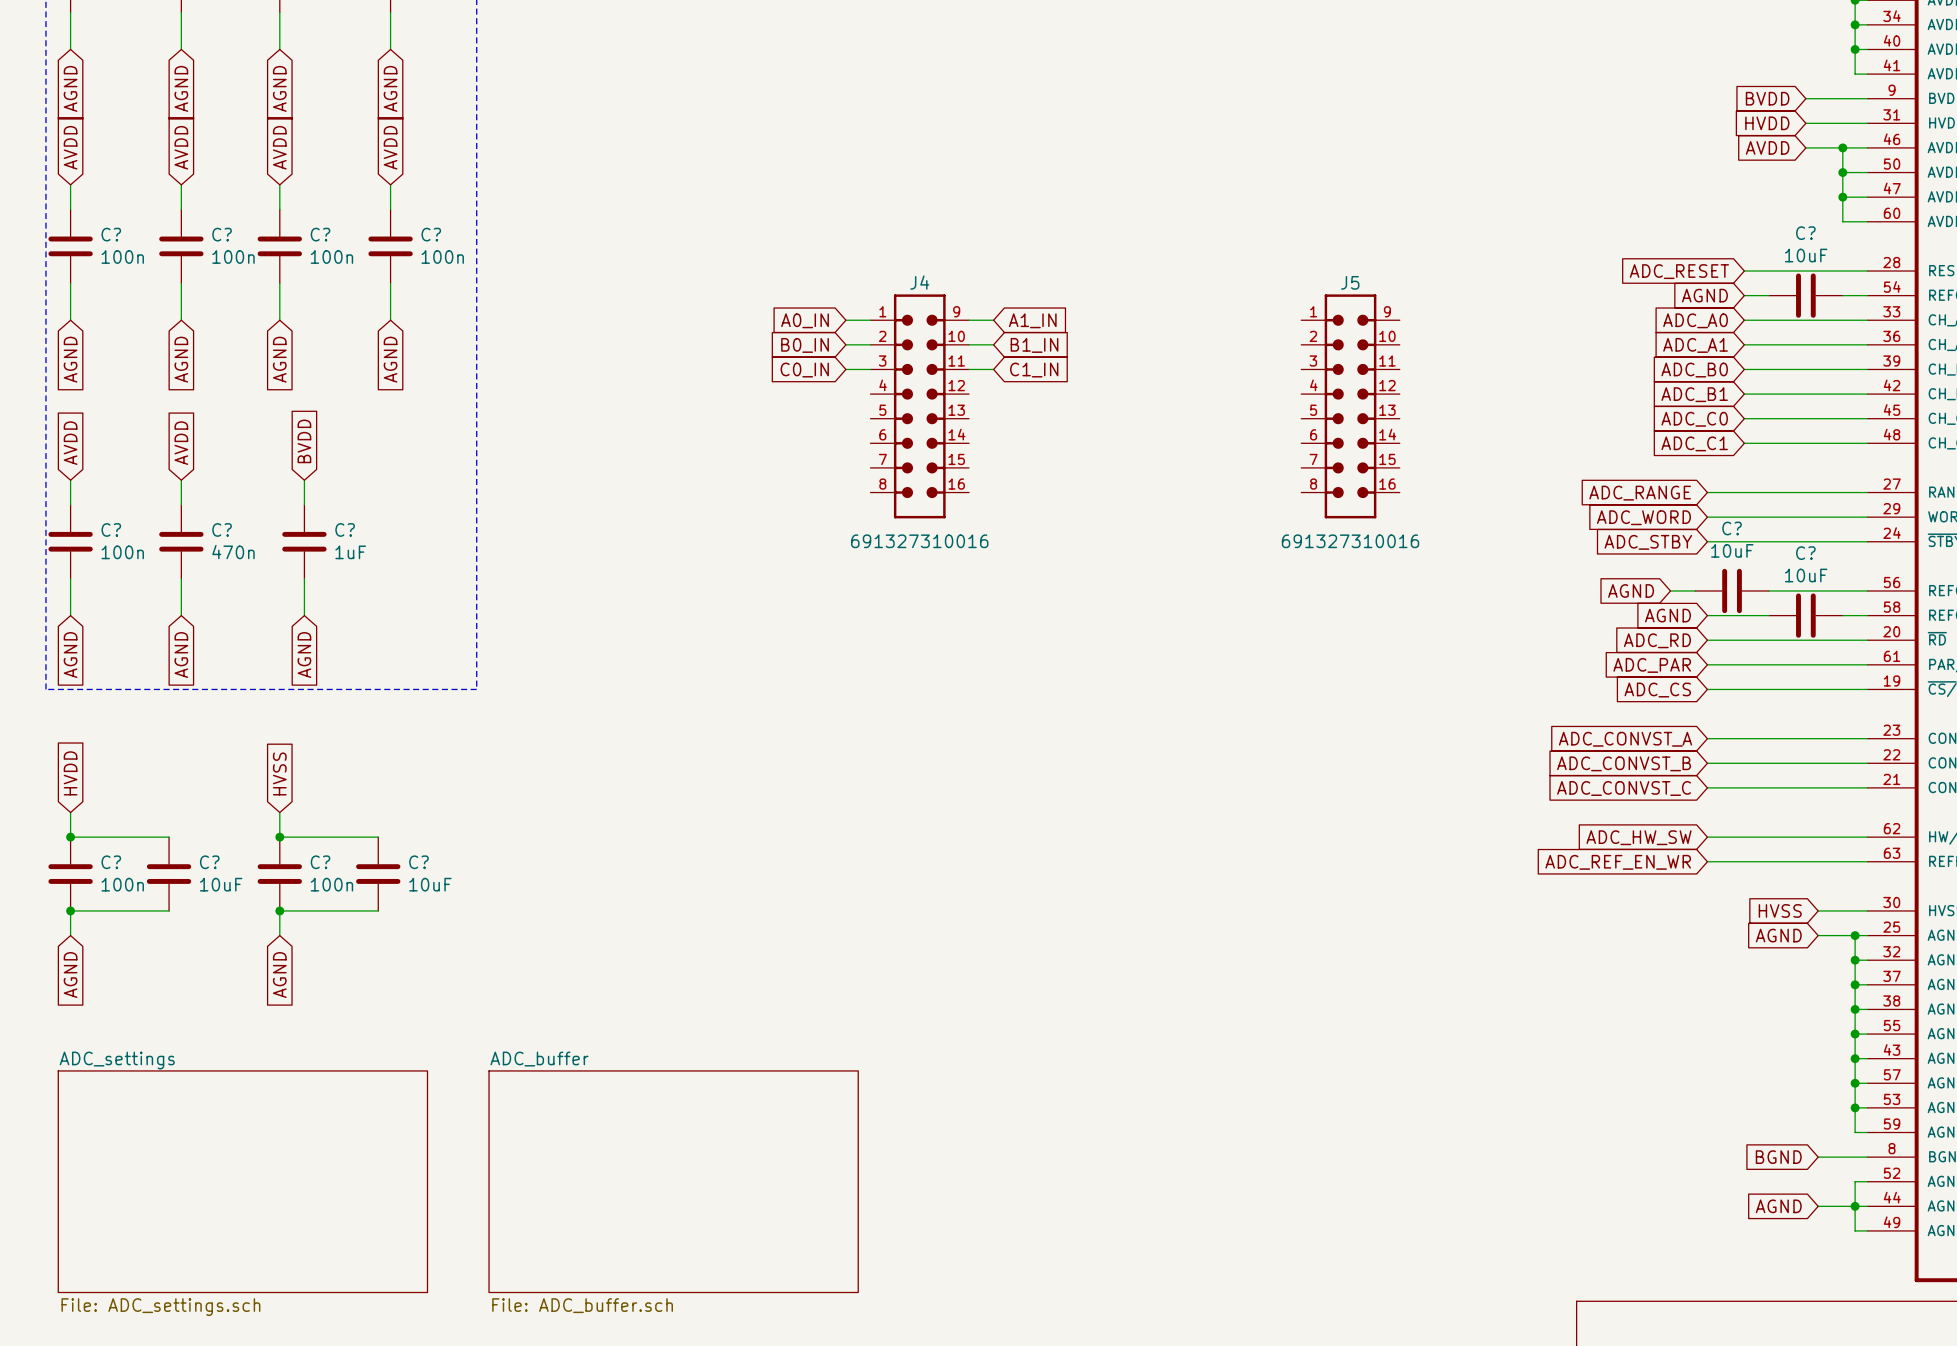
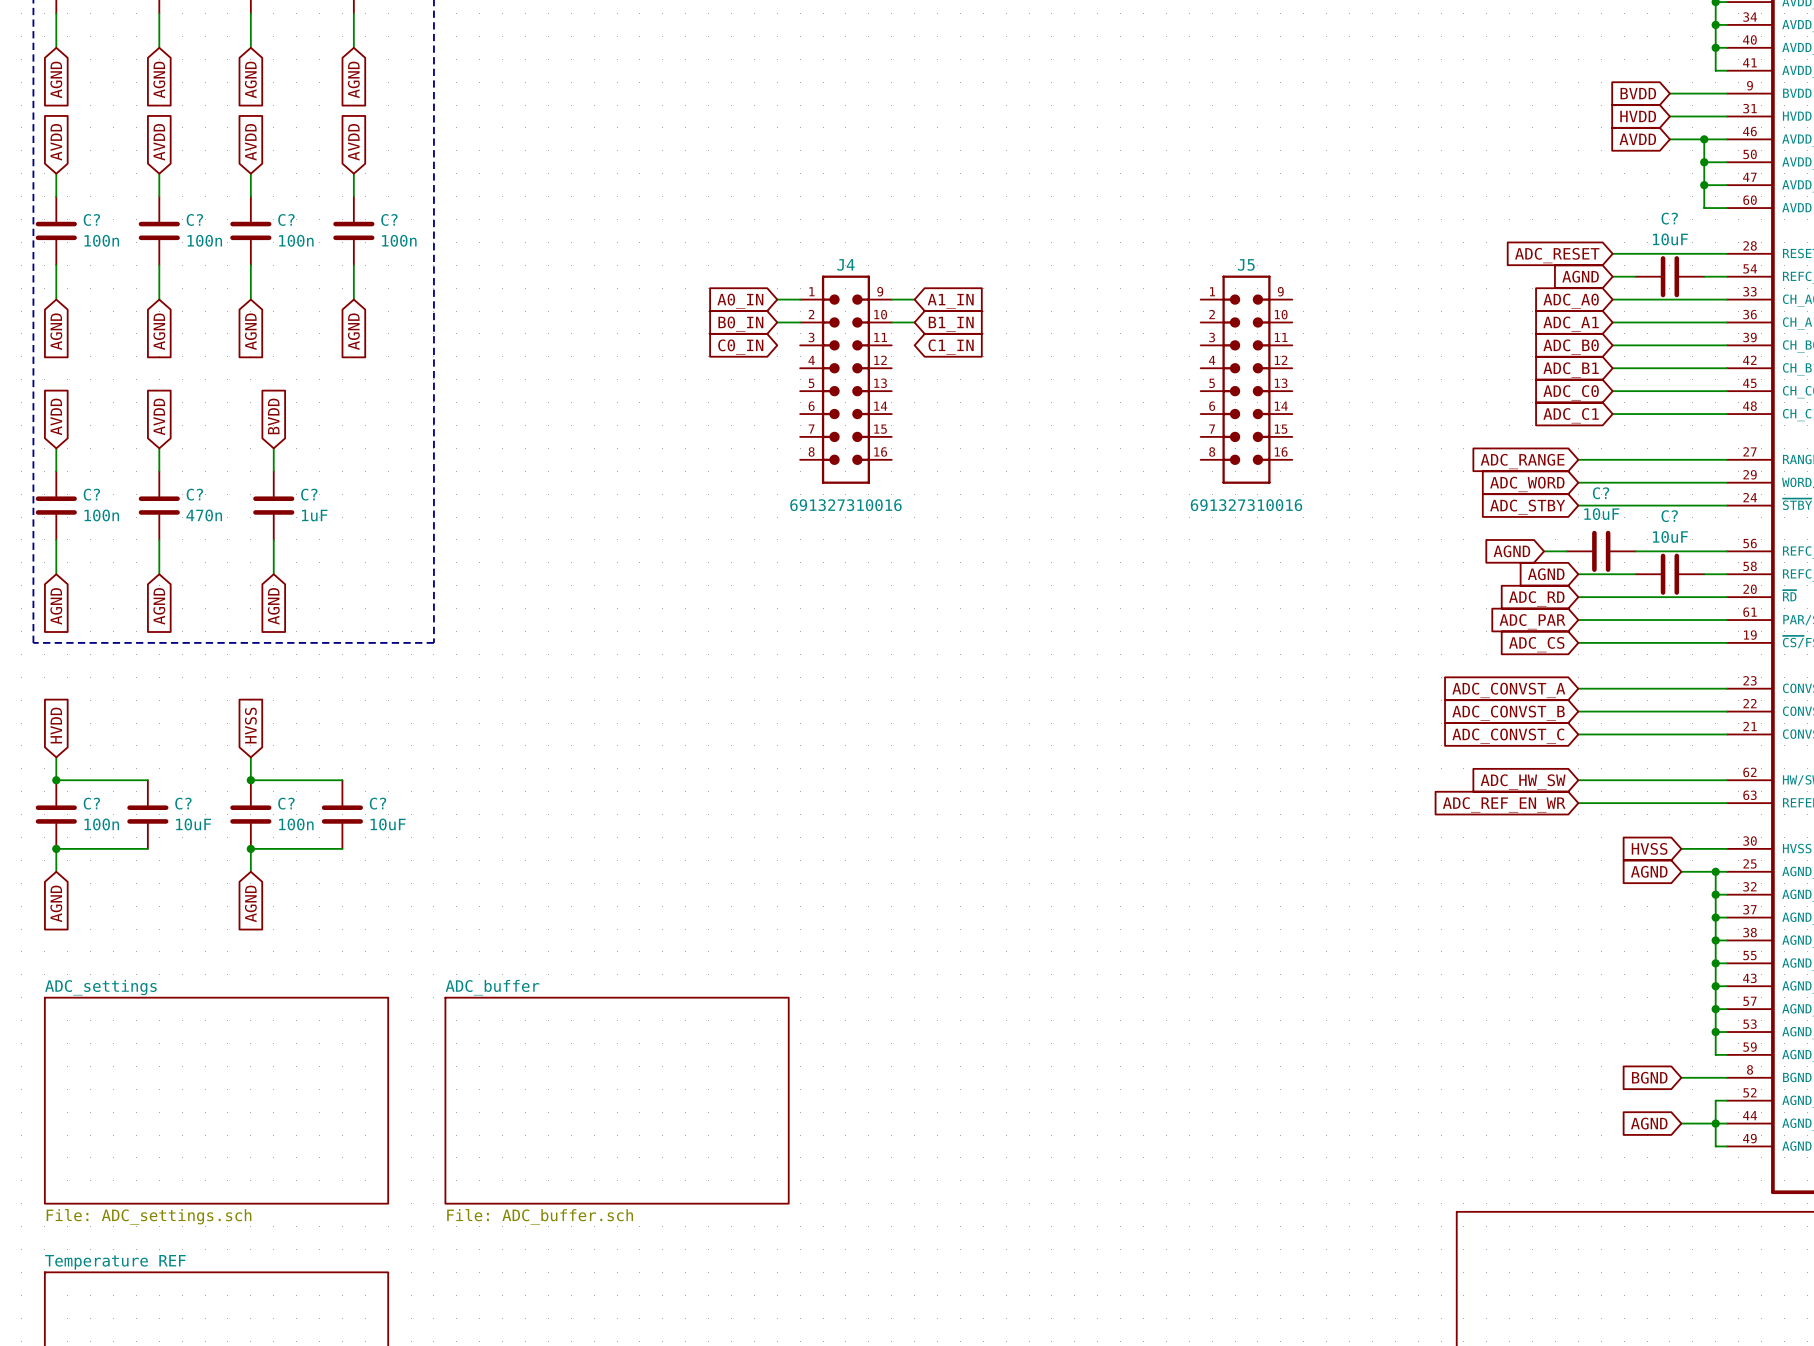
wire: (845, 369) (870, 369) -> none
wire: (969, 369) (993, 369) -> none

